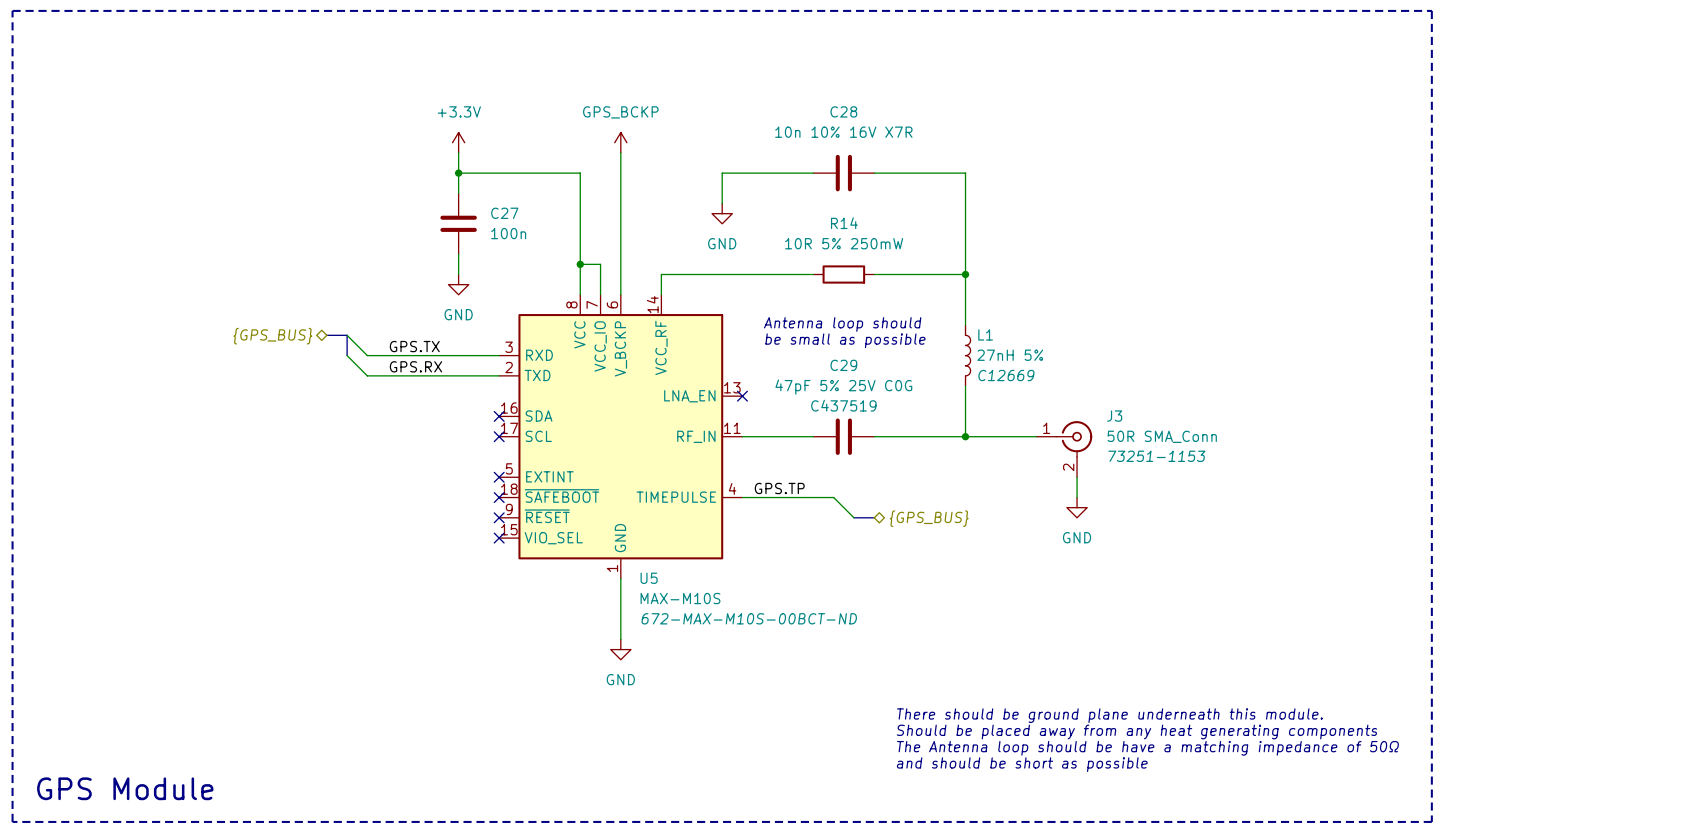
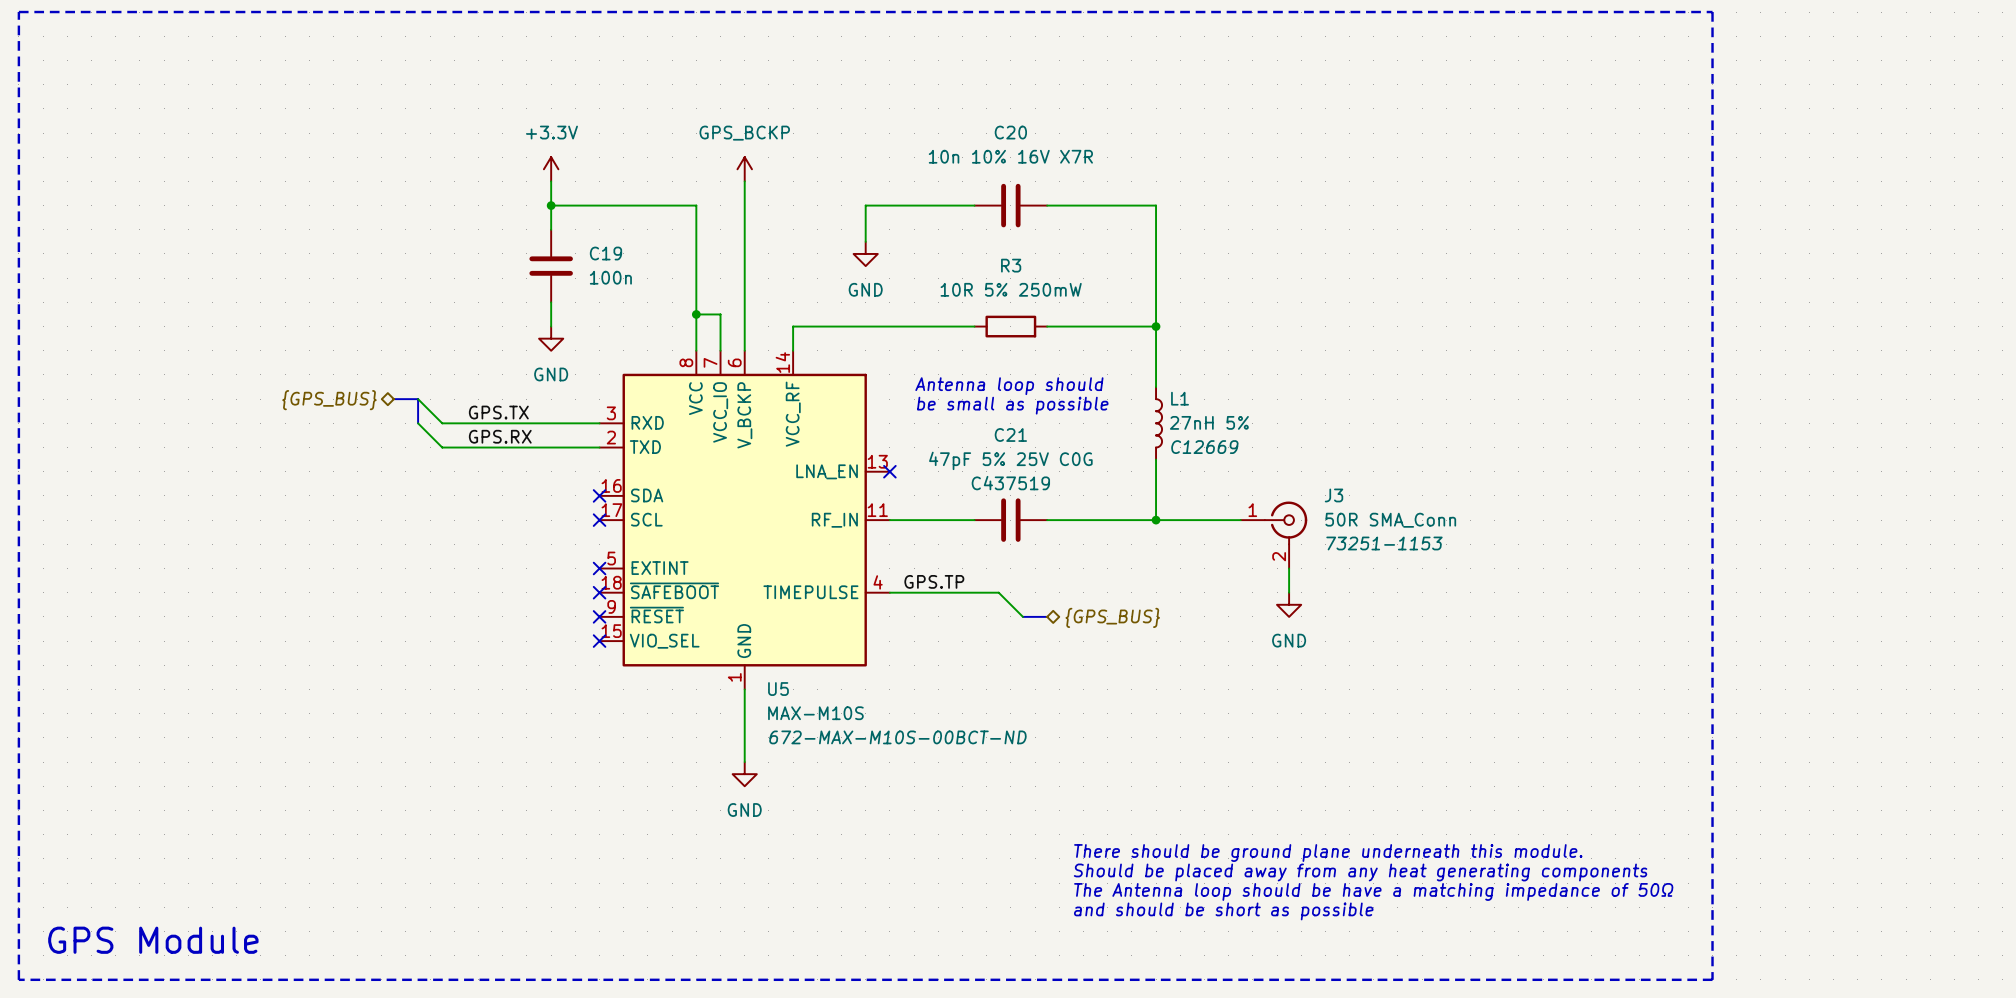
C28 name: C28 (843, 111) -> C20 (1010, 132)
C27 name: C27 (504, 213) -> C19 (605, 253)
R14 name: R14 (844, 223) -> R3 (1011, 265)
C29 name: C29 (843, 365) -> C21 (1010, 434)

